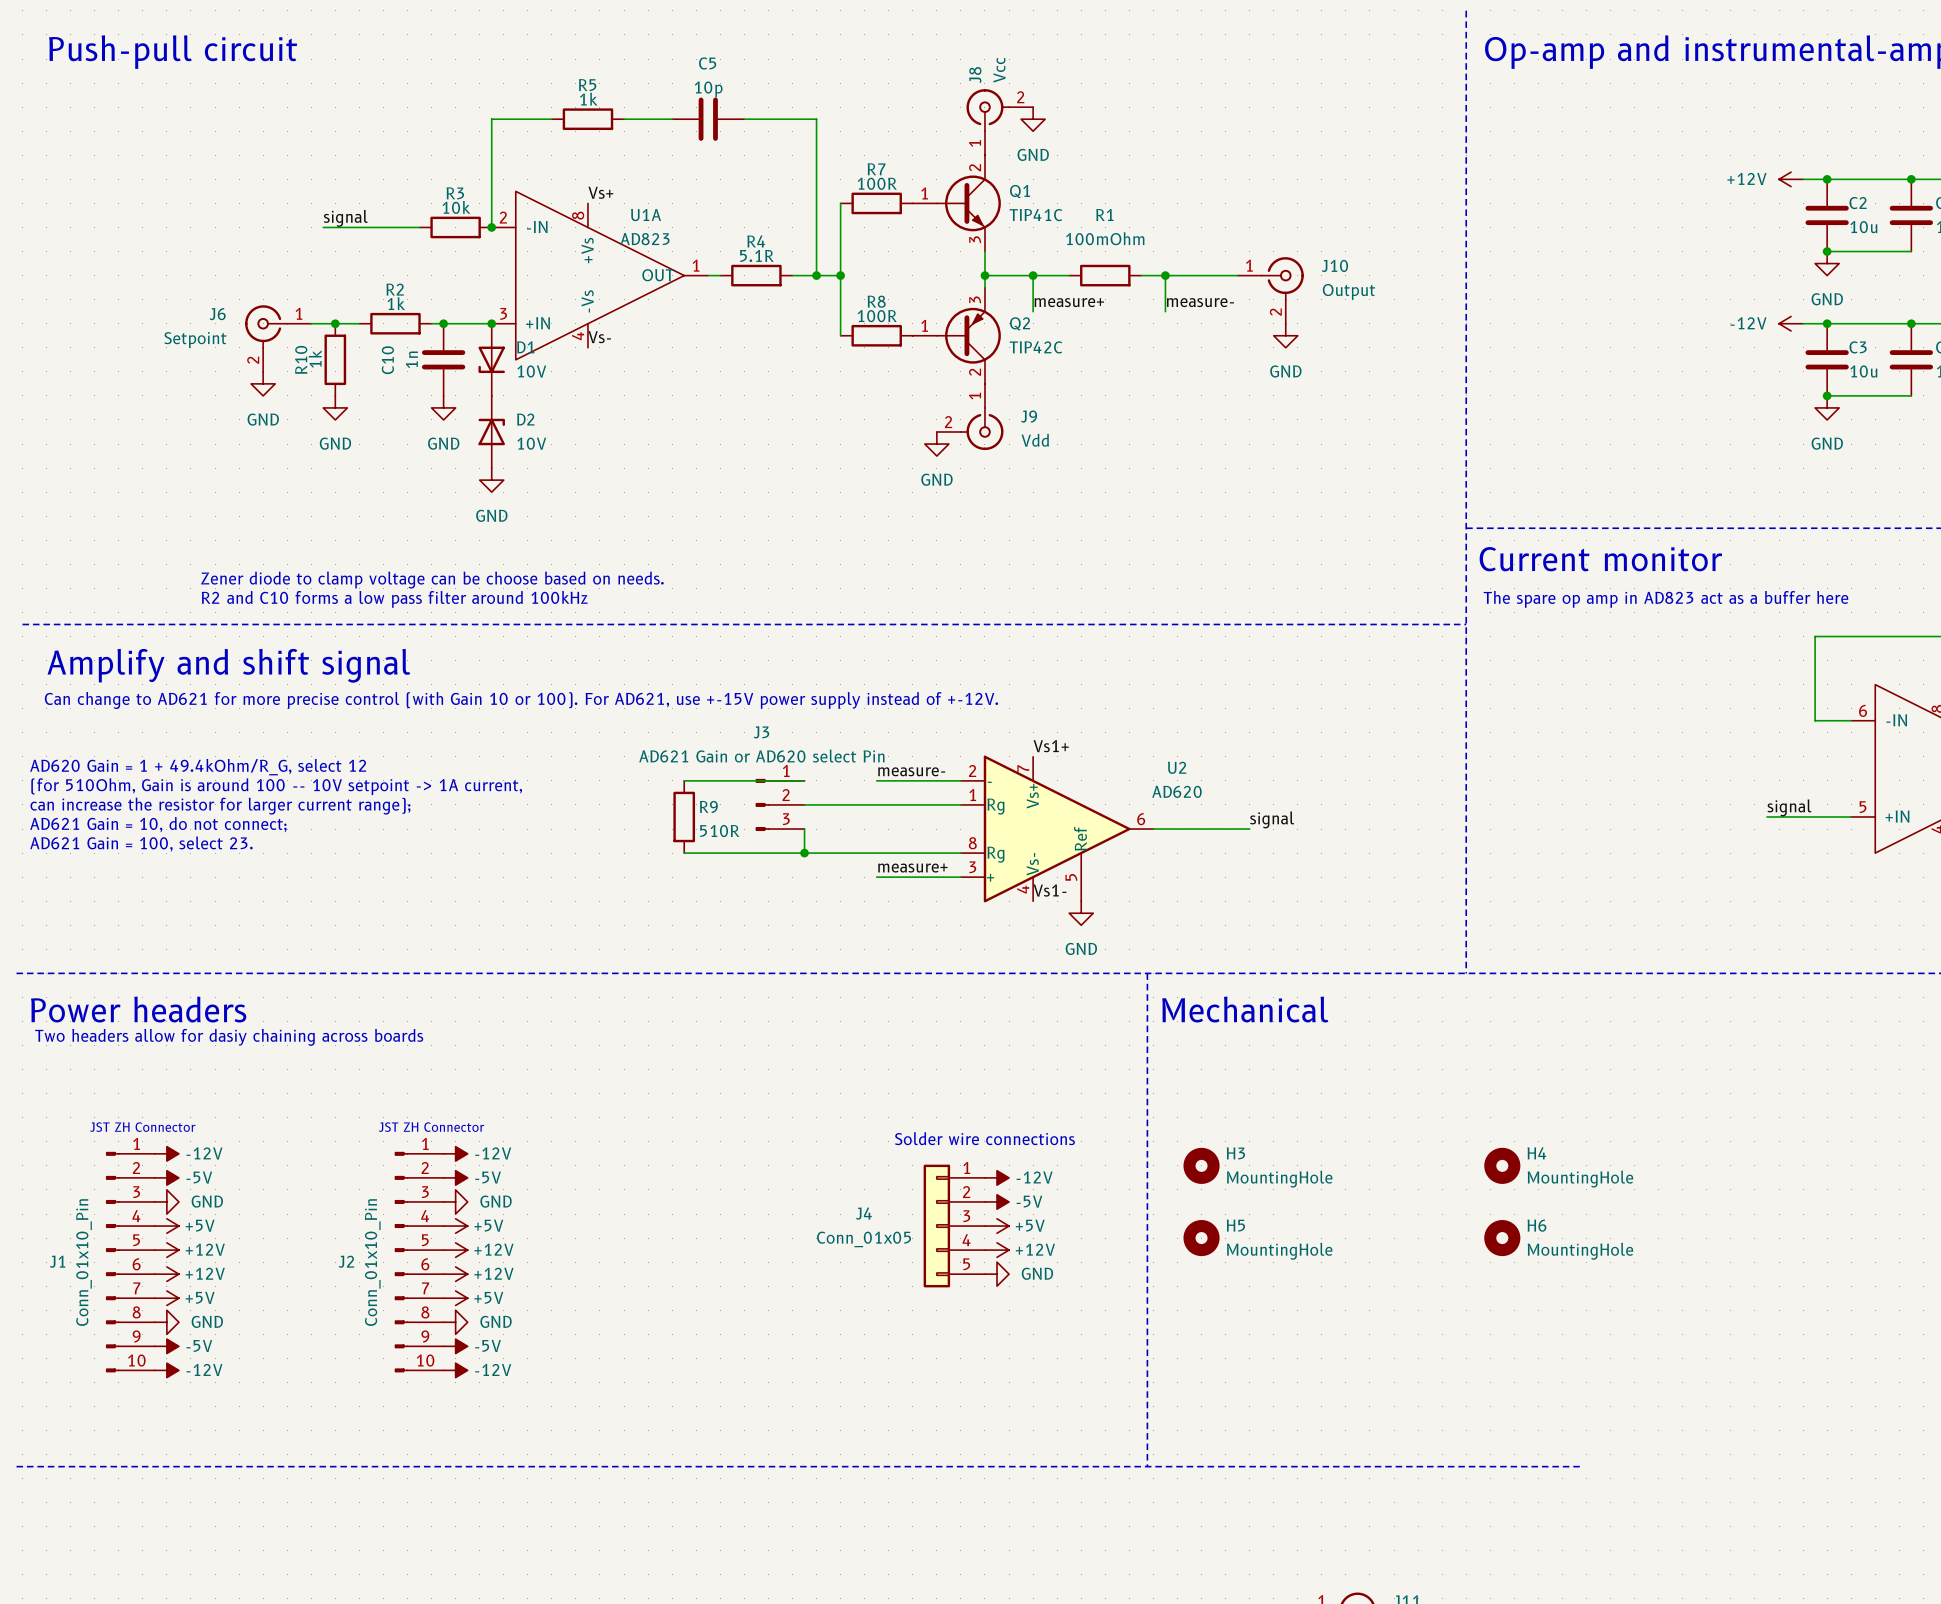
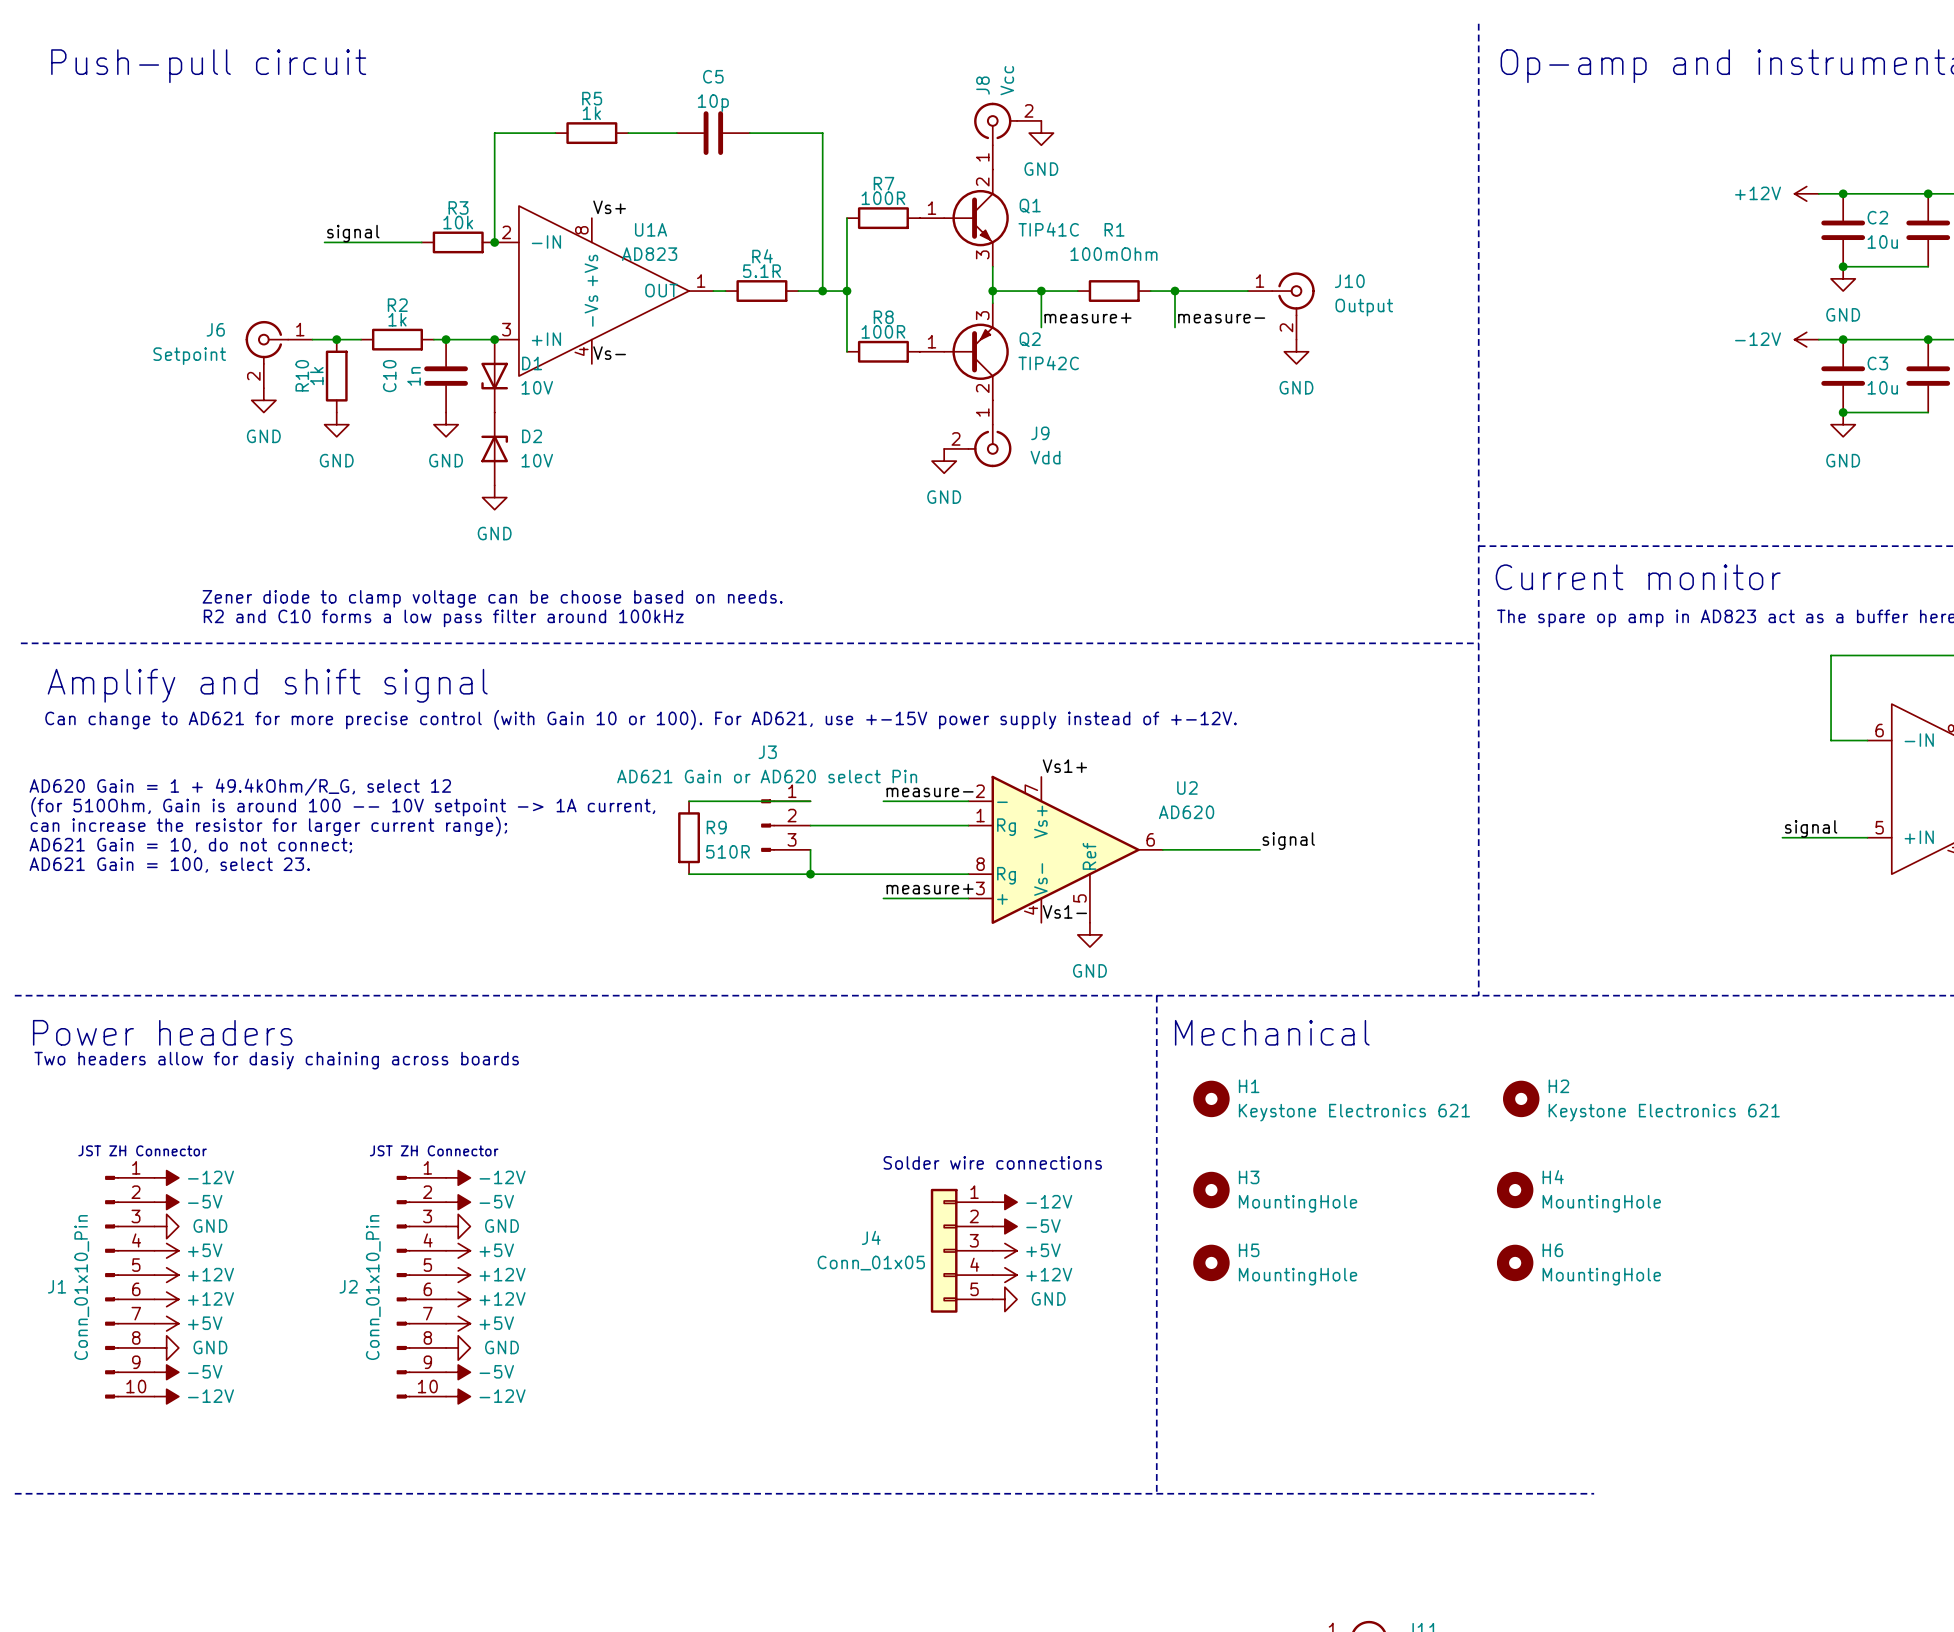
H1: none -> Keystone Electronics 621 (1211, 1098)
H2: none -> Keystone Electronics 621 (1521, 1098)

